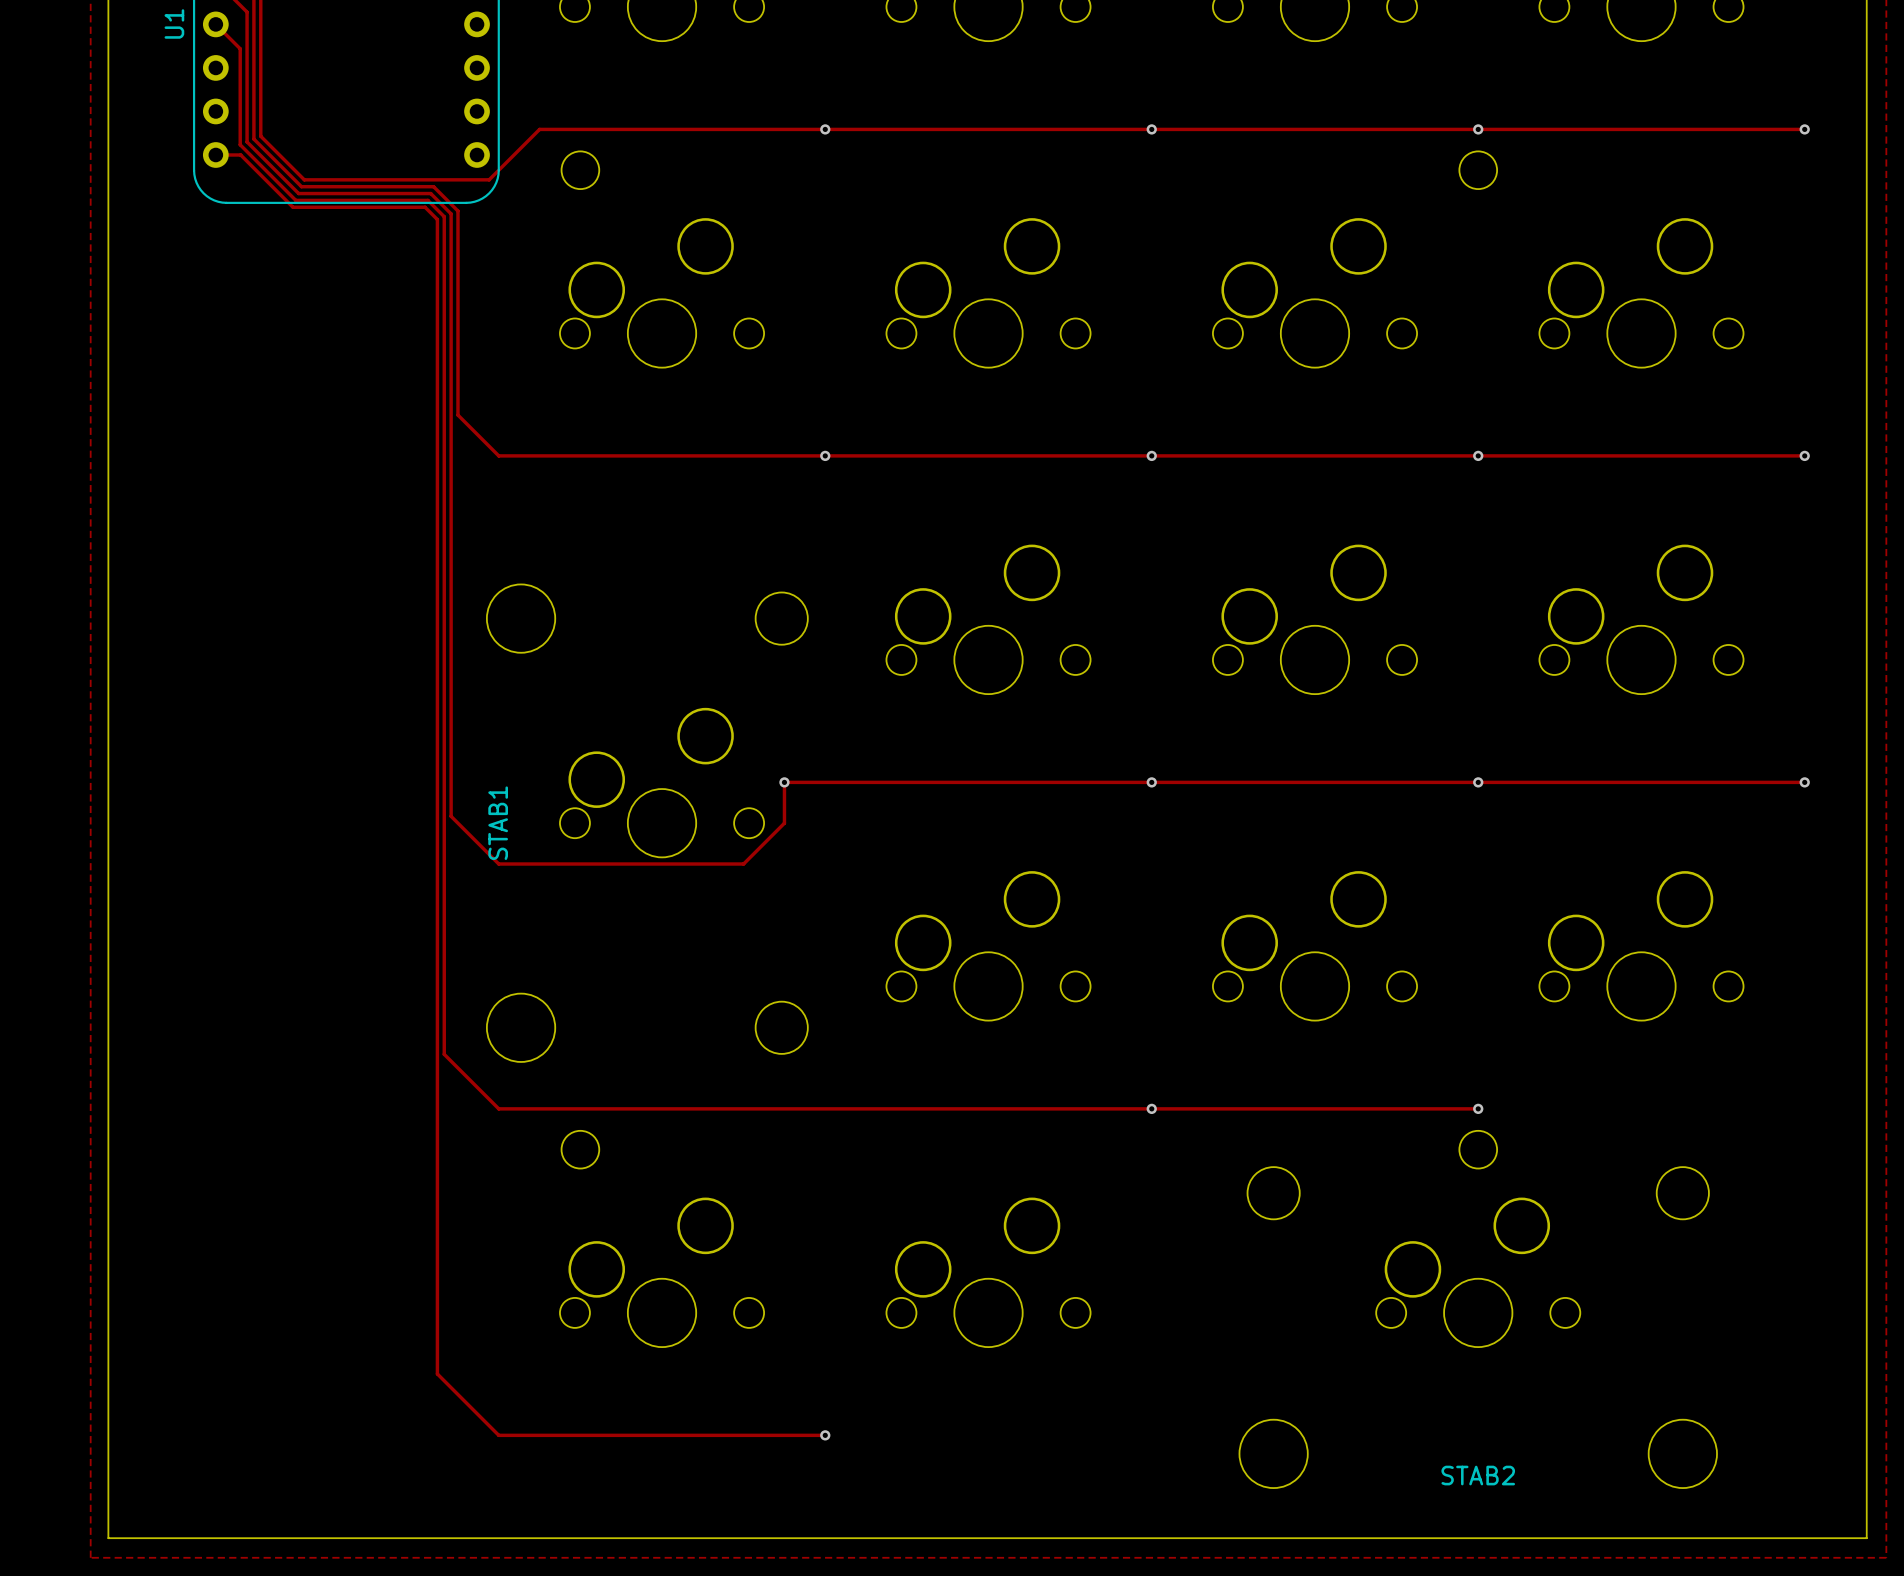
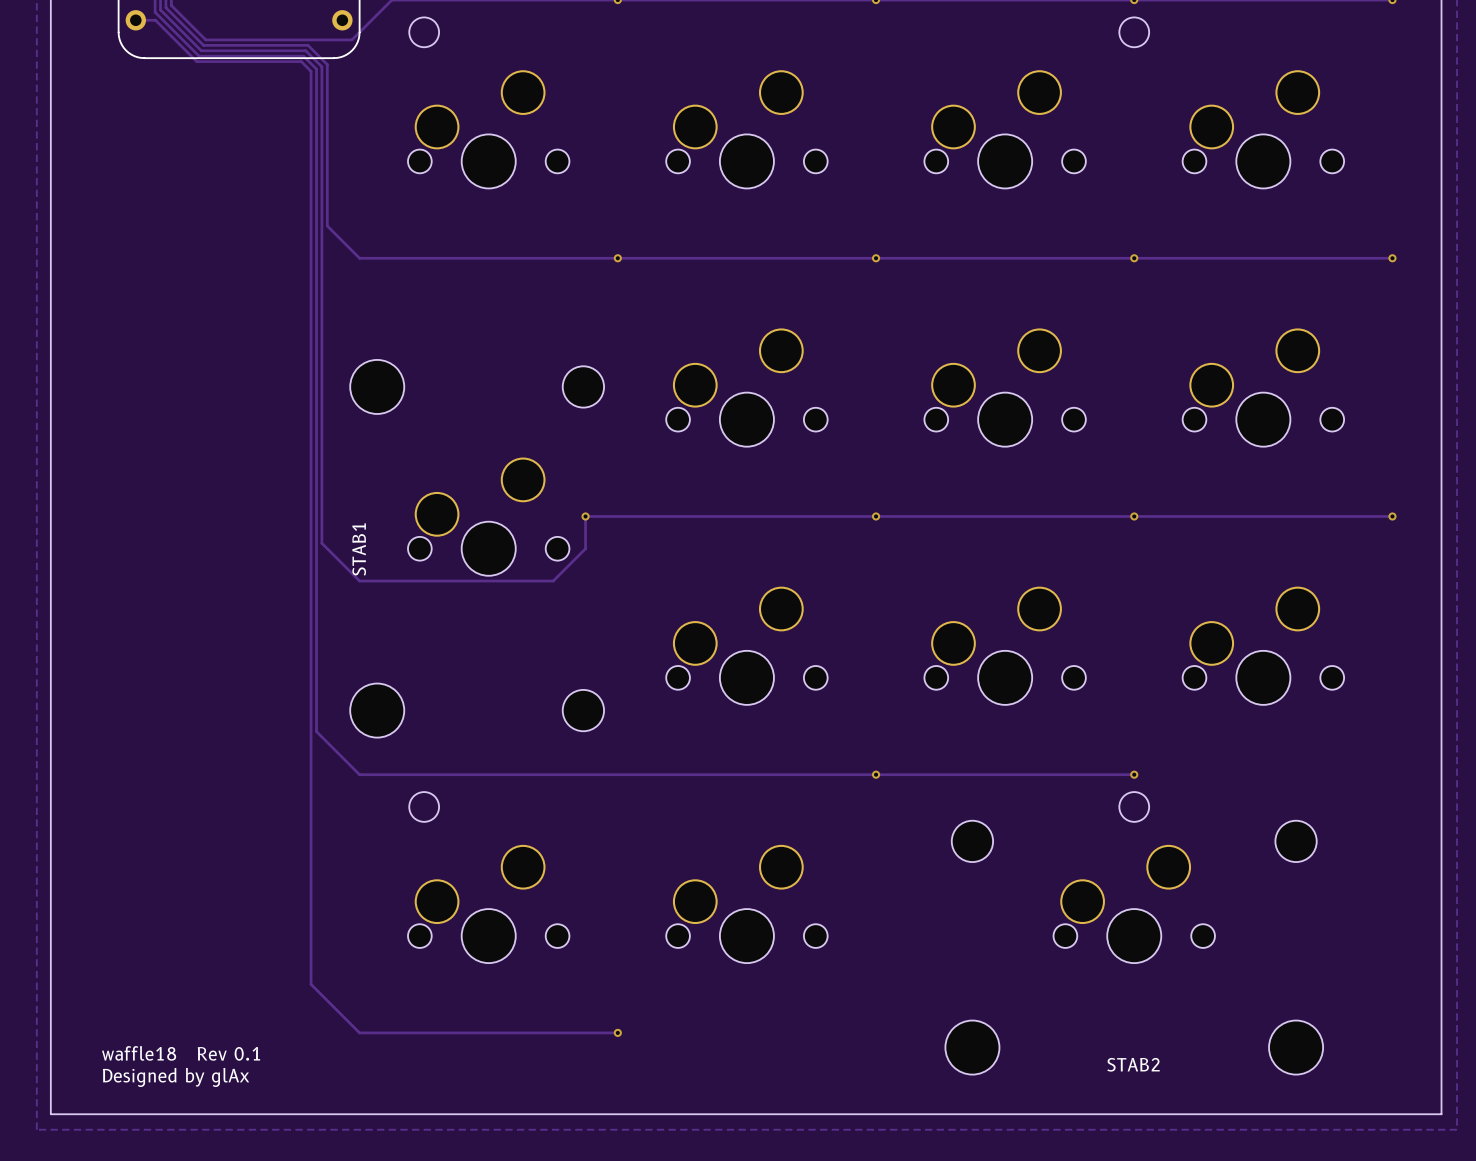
text: none -> waffle18 Rev 0.1 (181, 1053)
text: none -> Designed by glAx (176, 1077)

